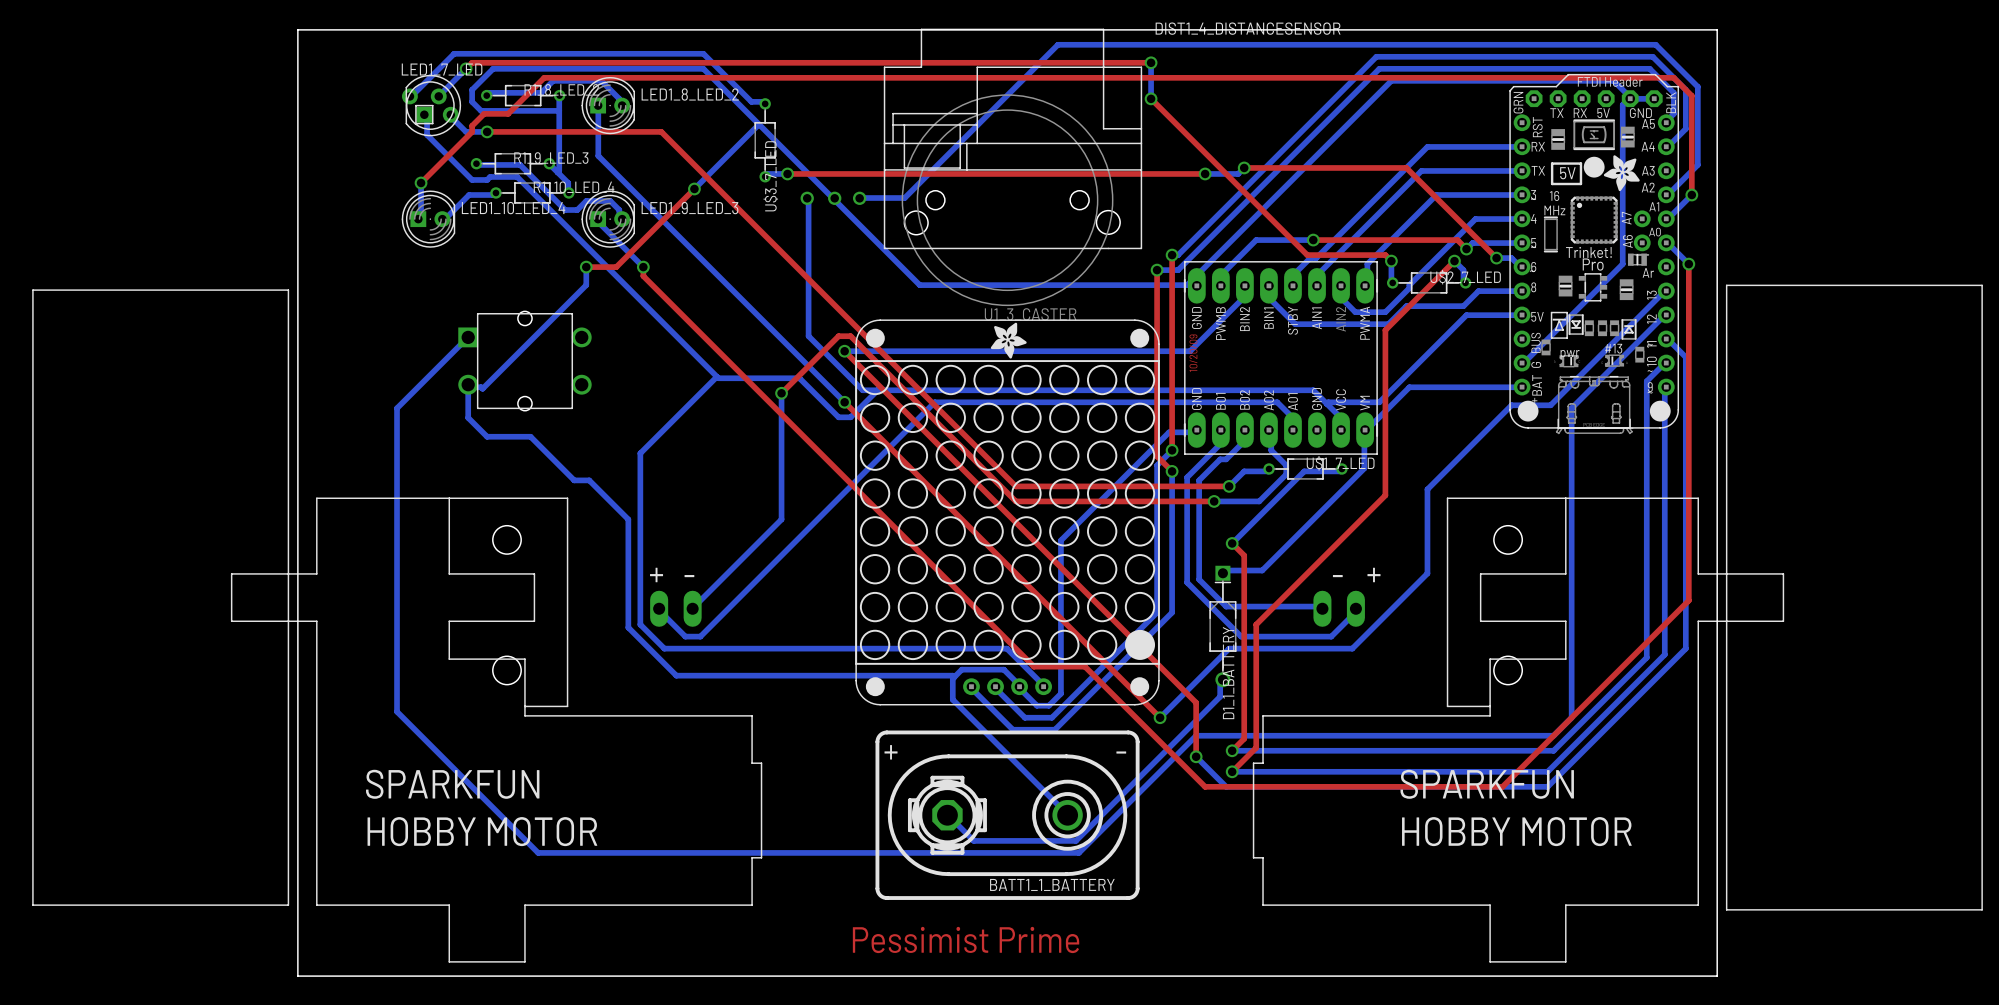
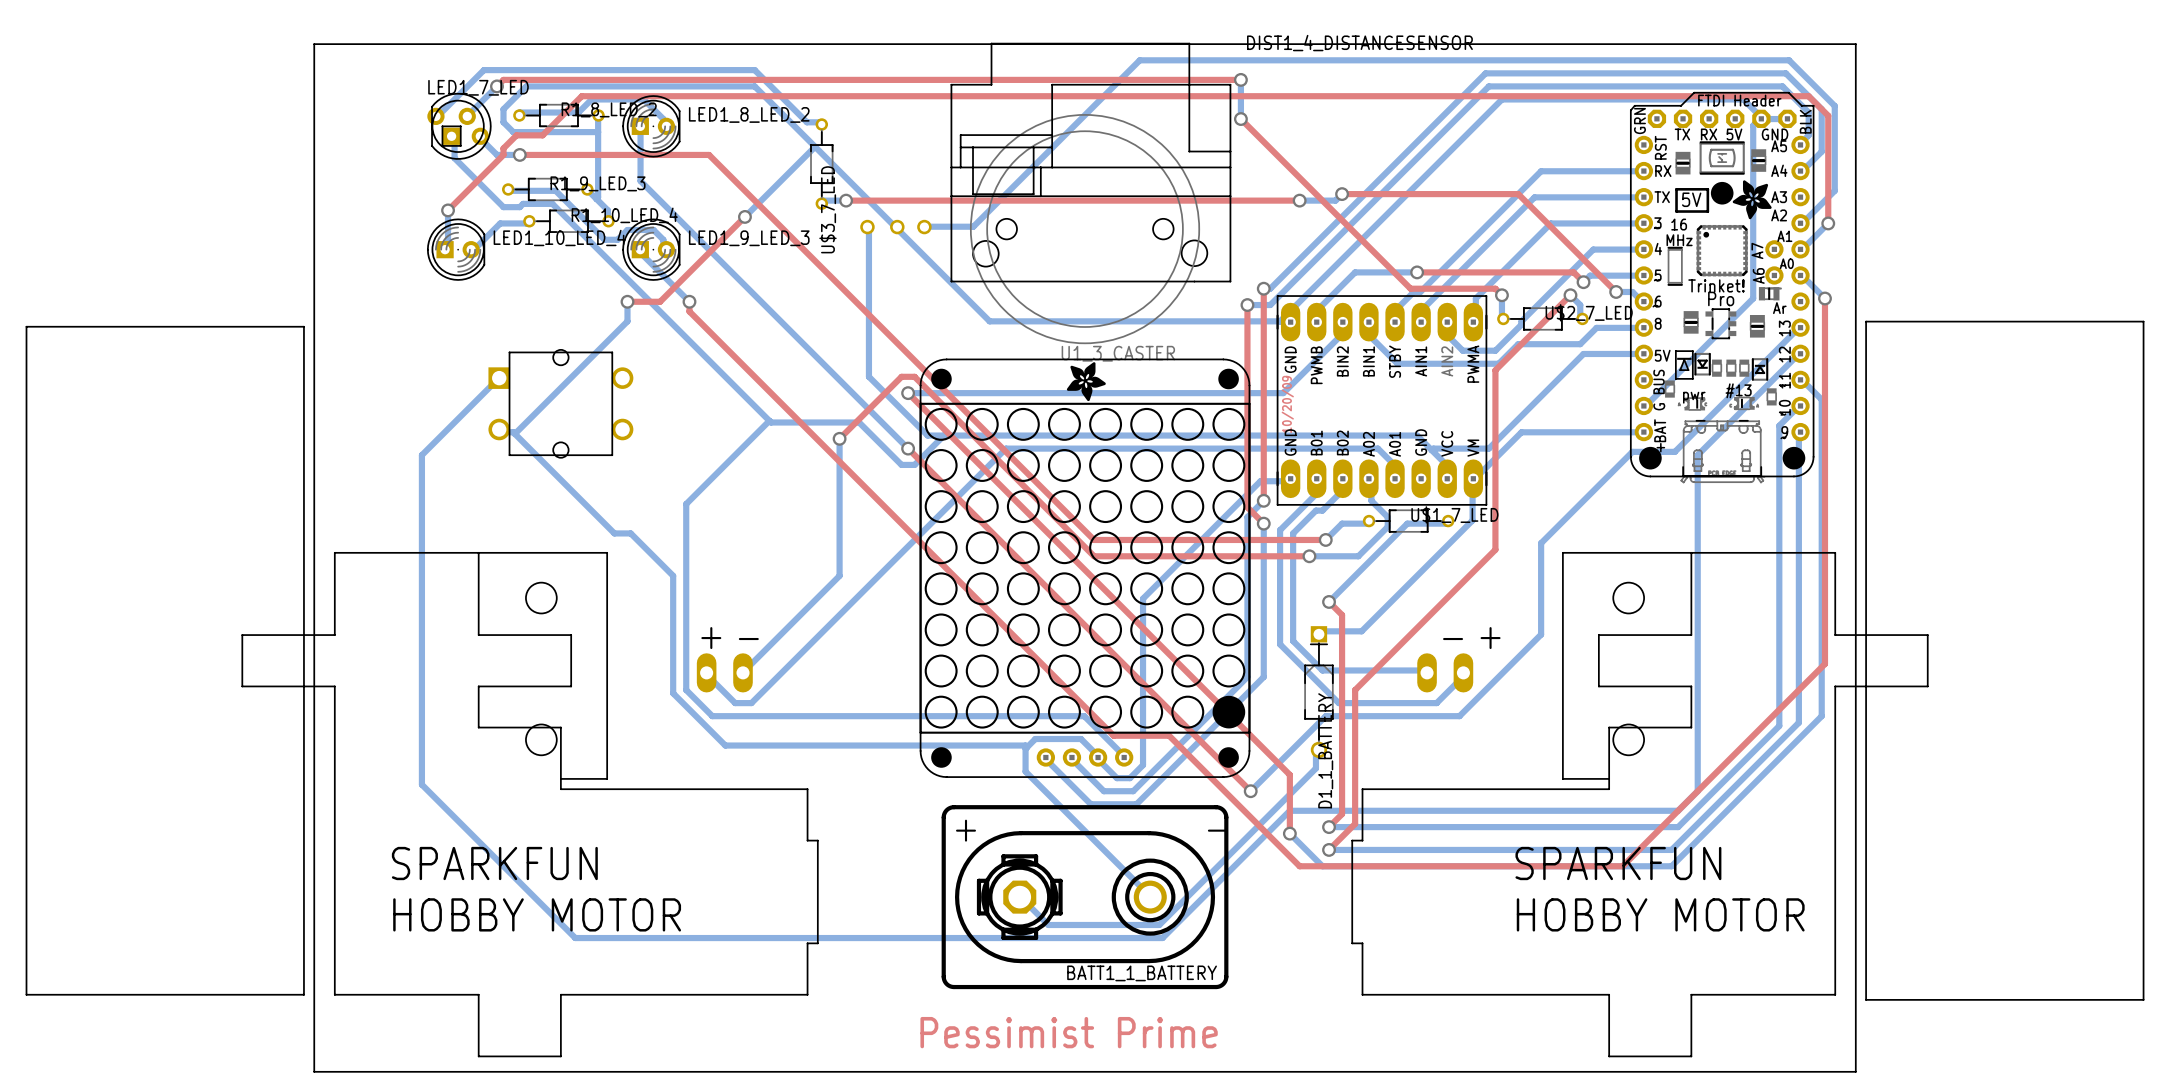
bottom track: (468, 384) (468, 417) (487, 436) (530, 436) -> (514, 433) (567, 486)

